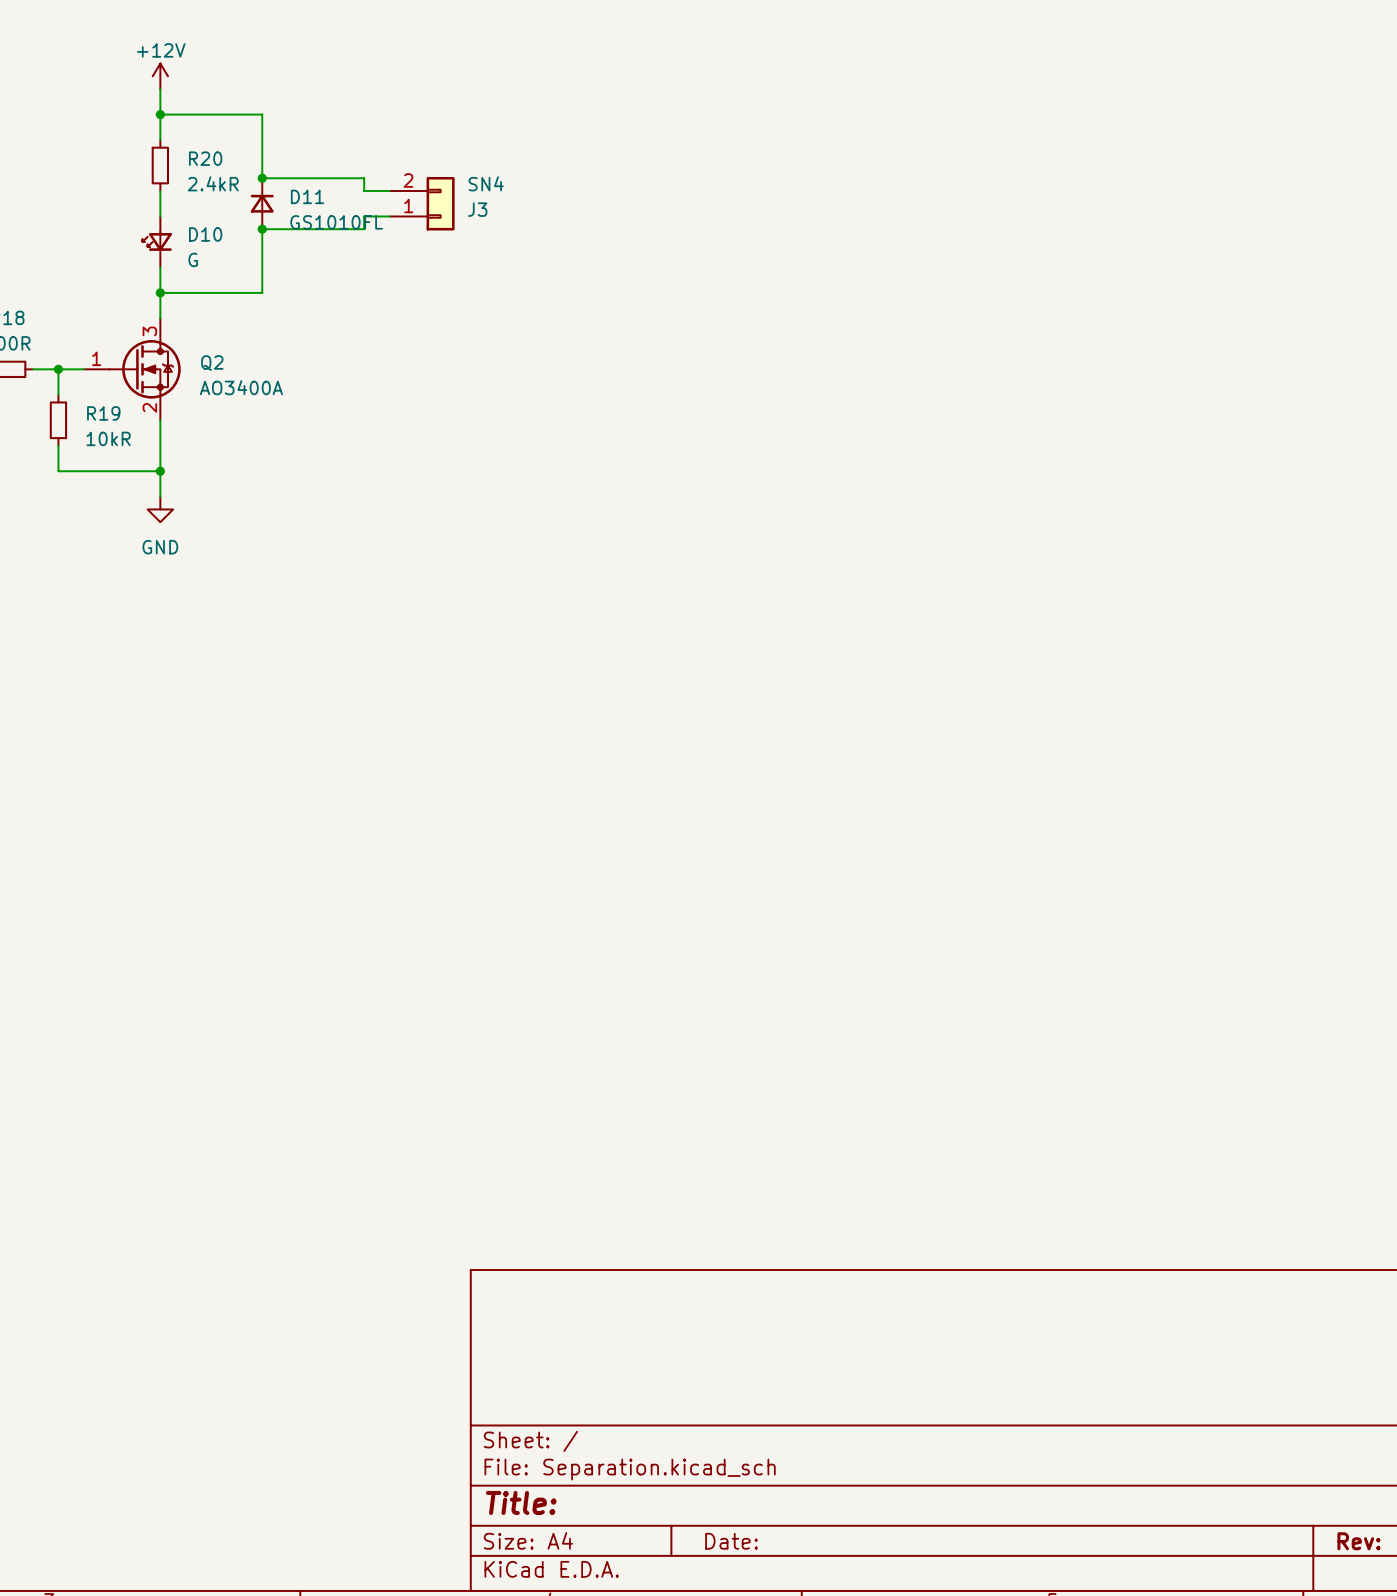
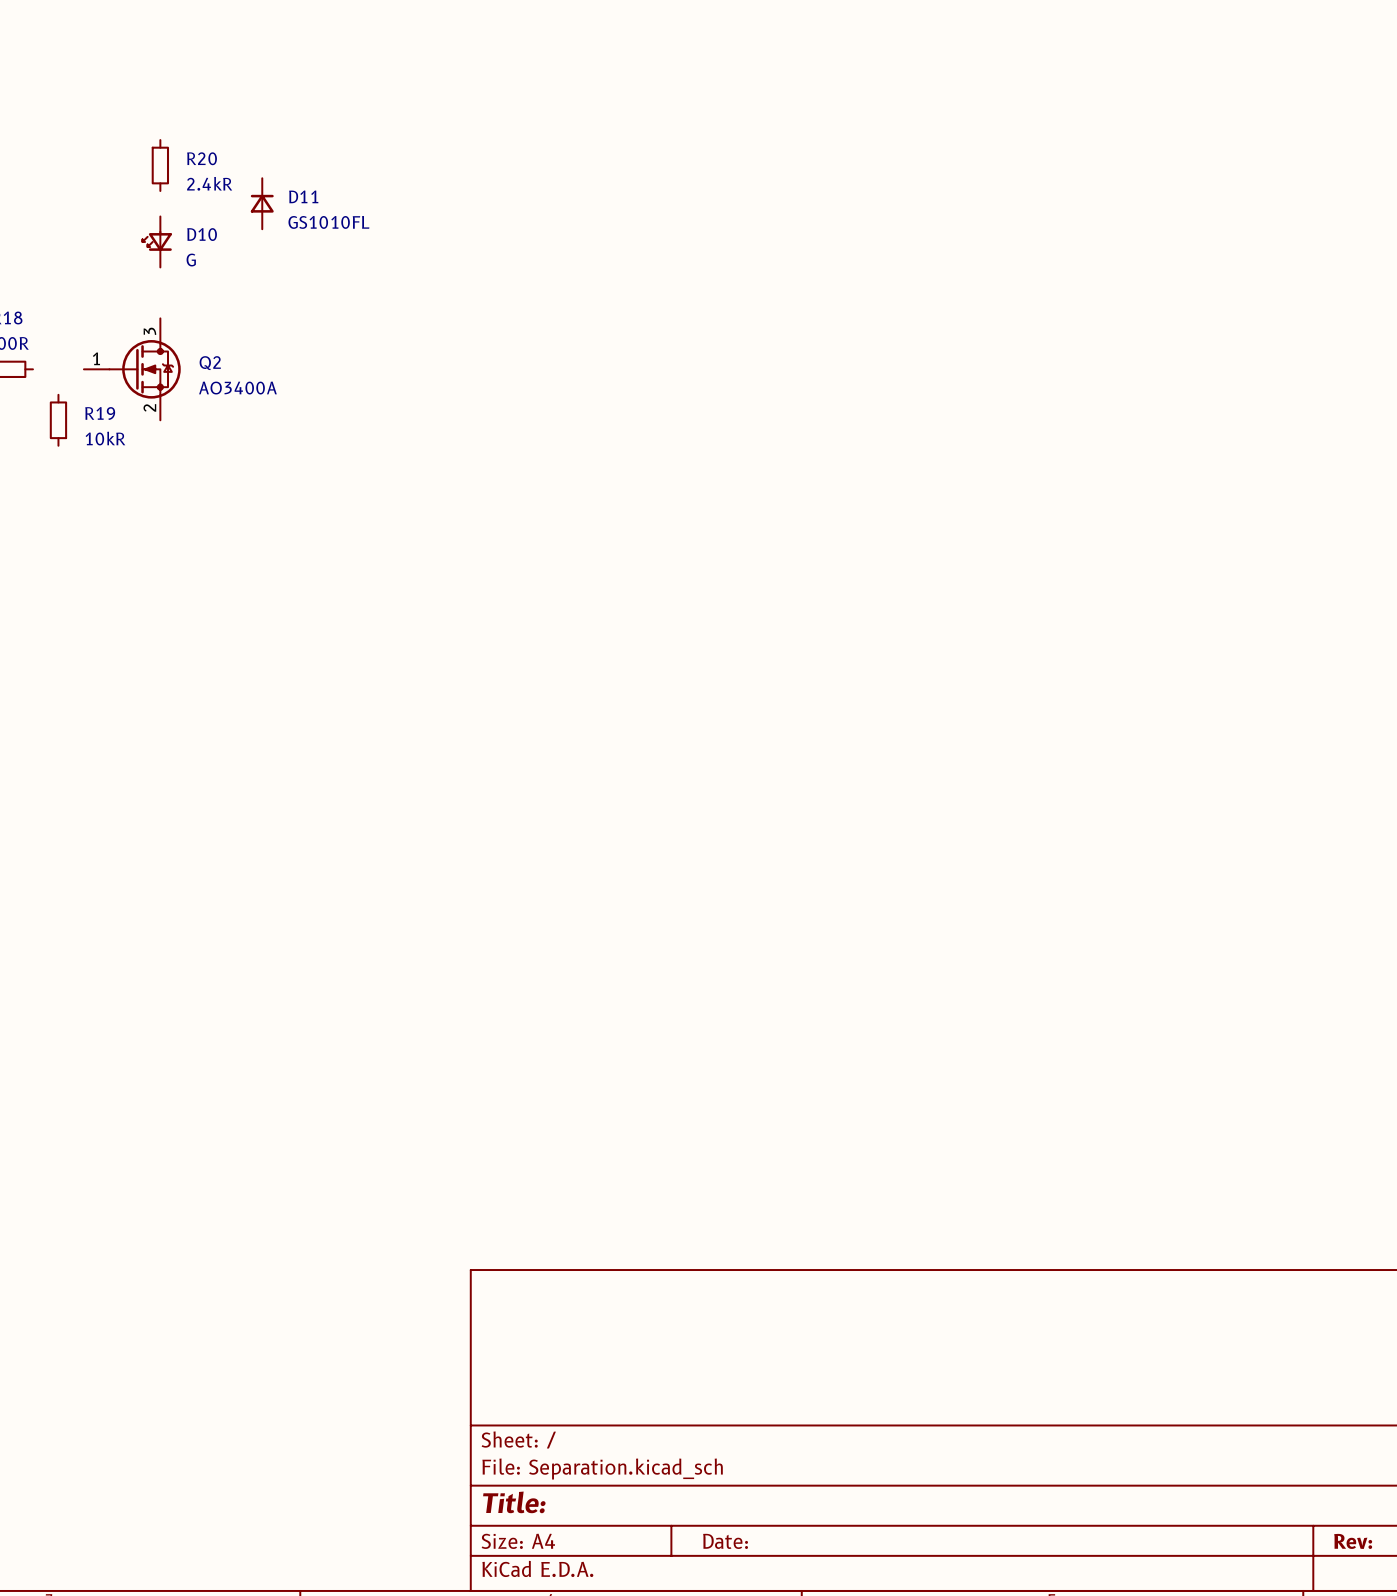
power symbol: +12V (160, 76) -> none
wire: (160, 89) (160, 140) -> none
wire: (160, 114) (262, 114) (262, 178) (364, 178) (364, 191) (389, 191) -> none
junction: (160, 114) -> none
junction: (262, 178) -> none
wire: (160, 191) (160, 216) -> none
J3: SN4 (422, 203) -> none
wire: (389, 216) (364, 216) (364, 229) (262, 229) (262, 292) (160, 292) -> none
junction: (262, 229) -> none
wire: (160, 267) (160, 318) -> none
junction: (160, 292) -> none
wire: (32, 369) (83, 369) -> none
wire: (58, 369) (58, 394) -> none
junction: (58, 369) -> none
wire: (160, 420) (160, 496) -> none
wire: (58, 445) (58, 471) (160, 471) -> none
junction: (160, 471) -> none
power symbol: GND (160, 509) -> none

